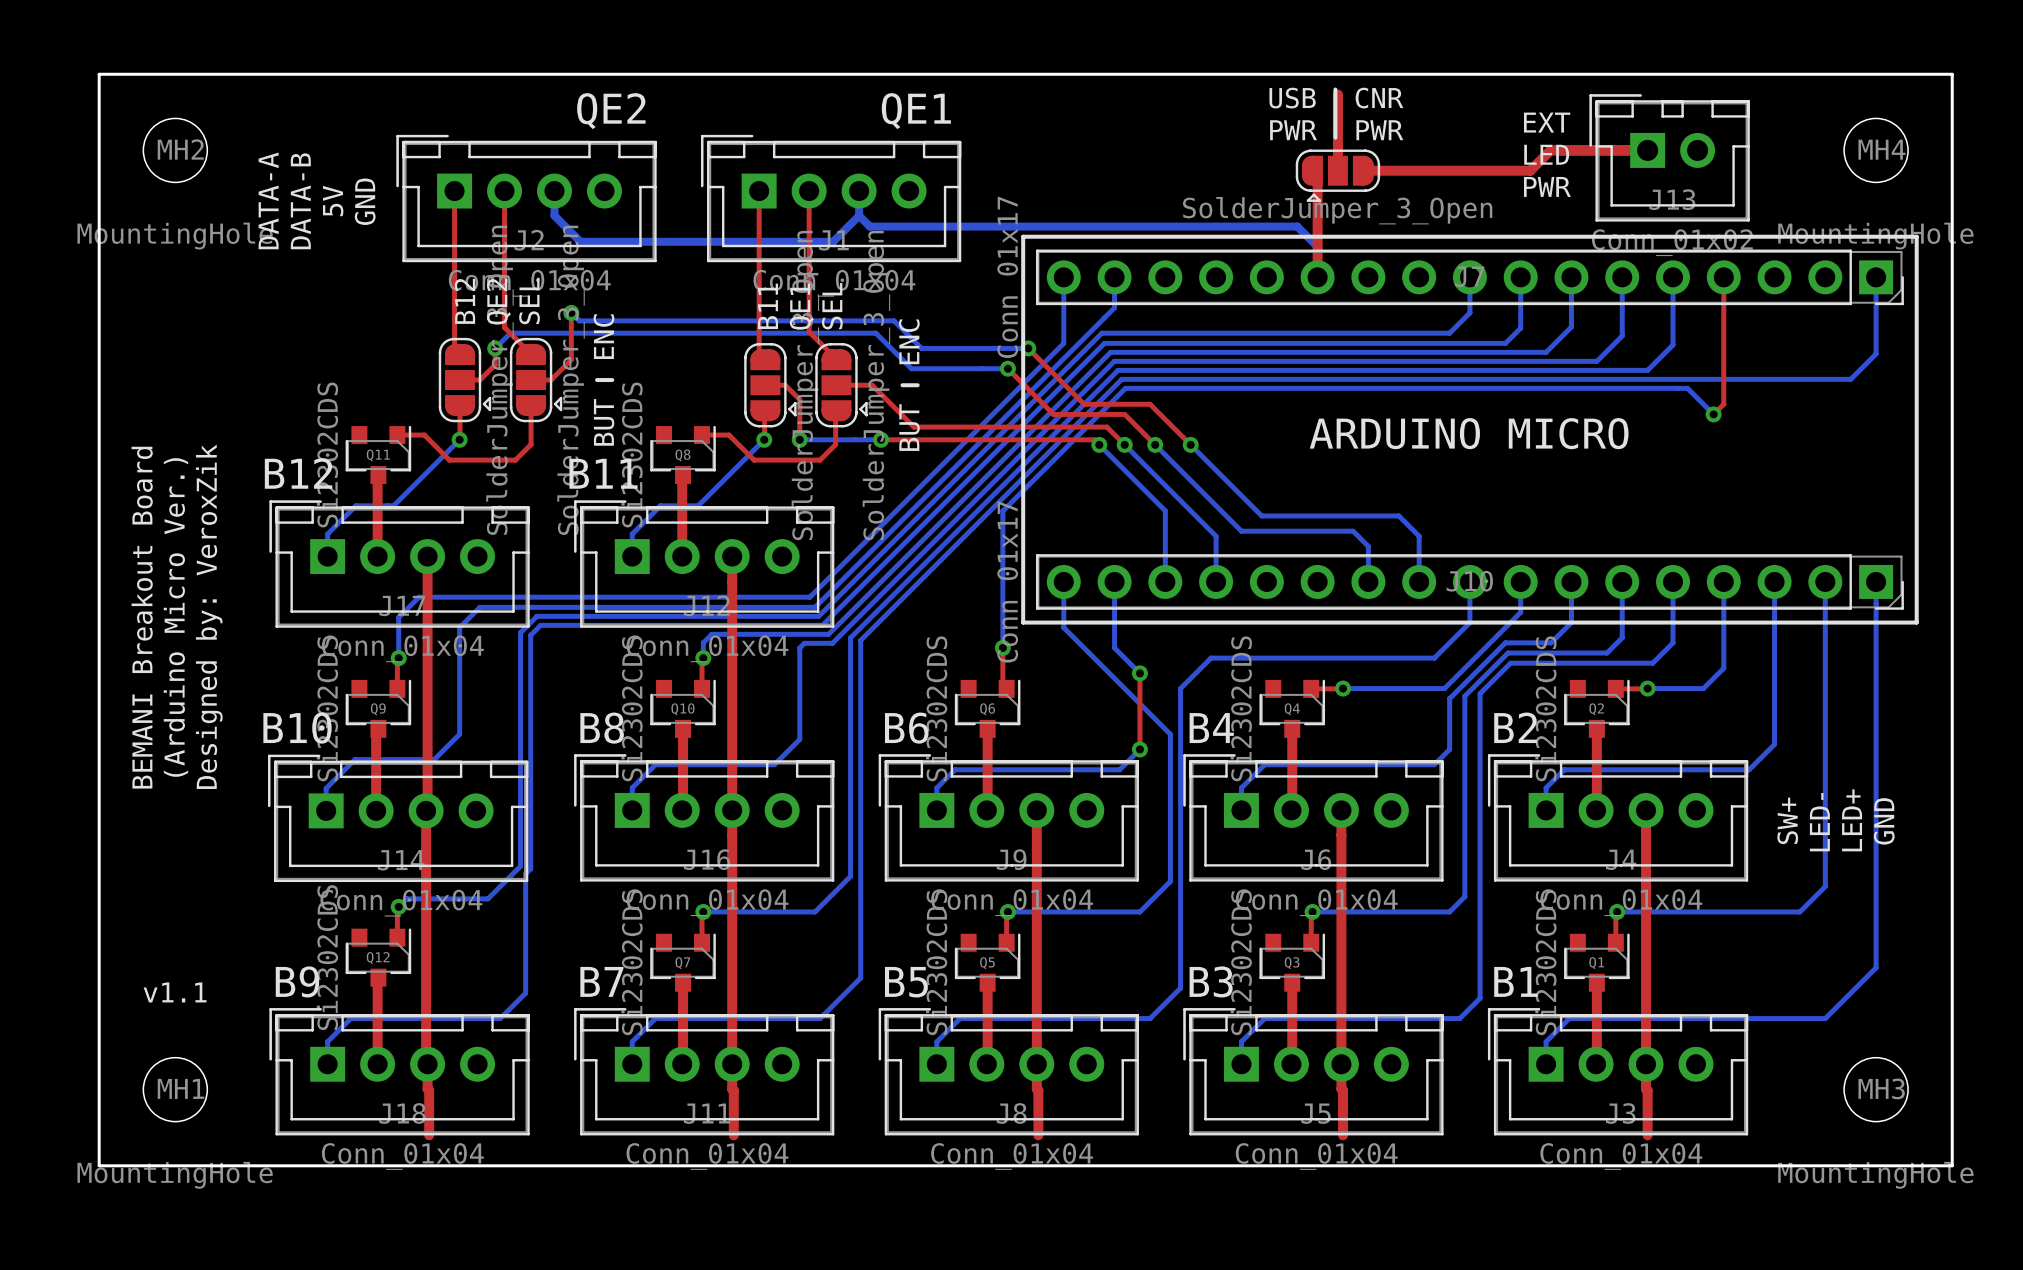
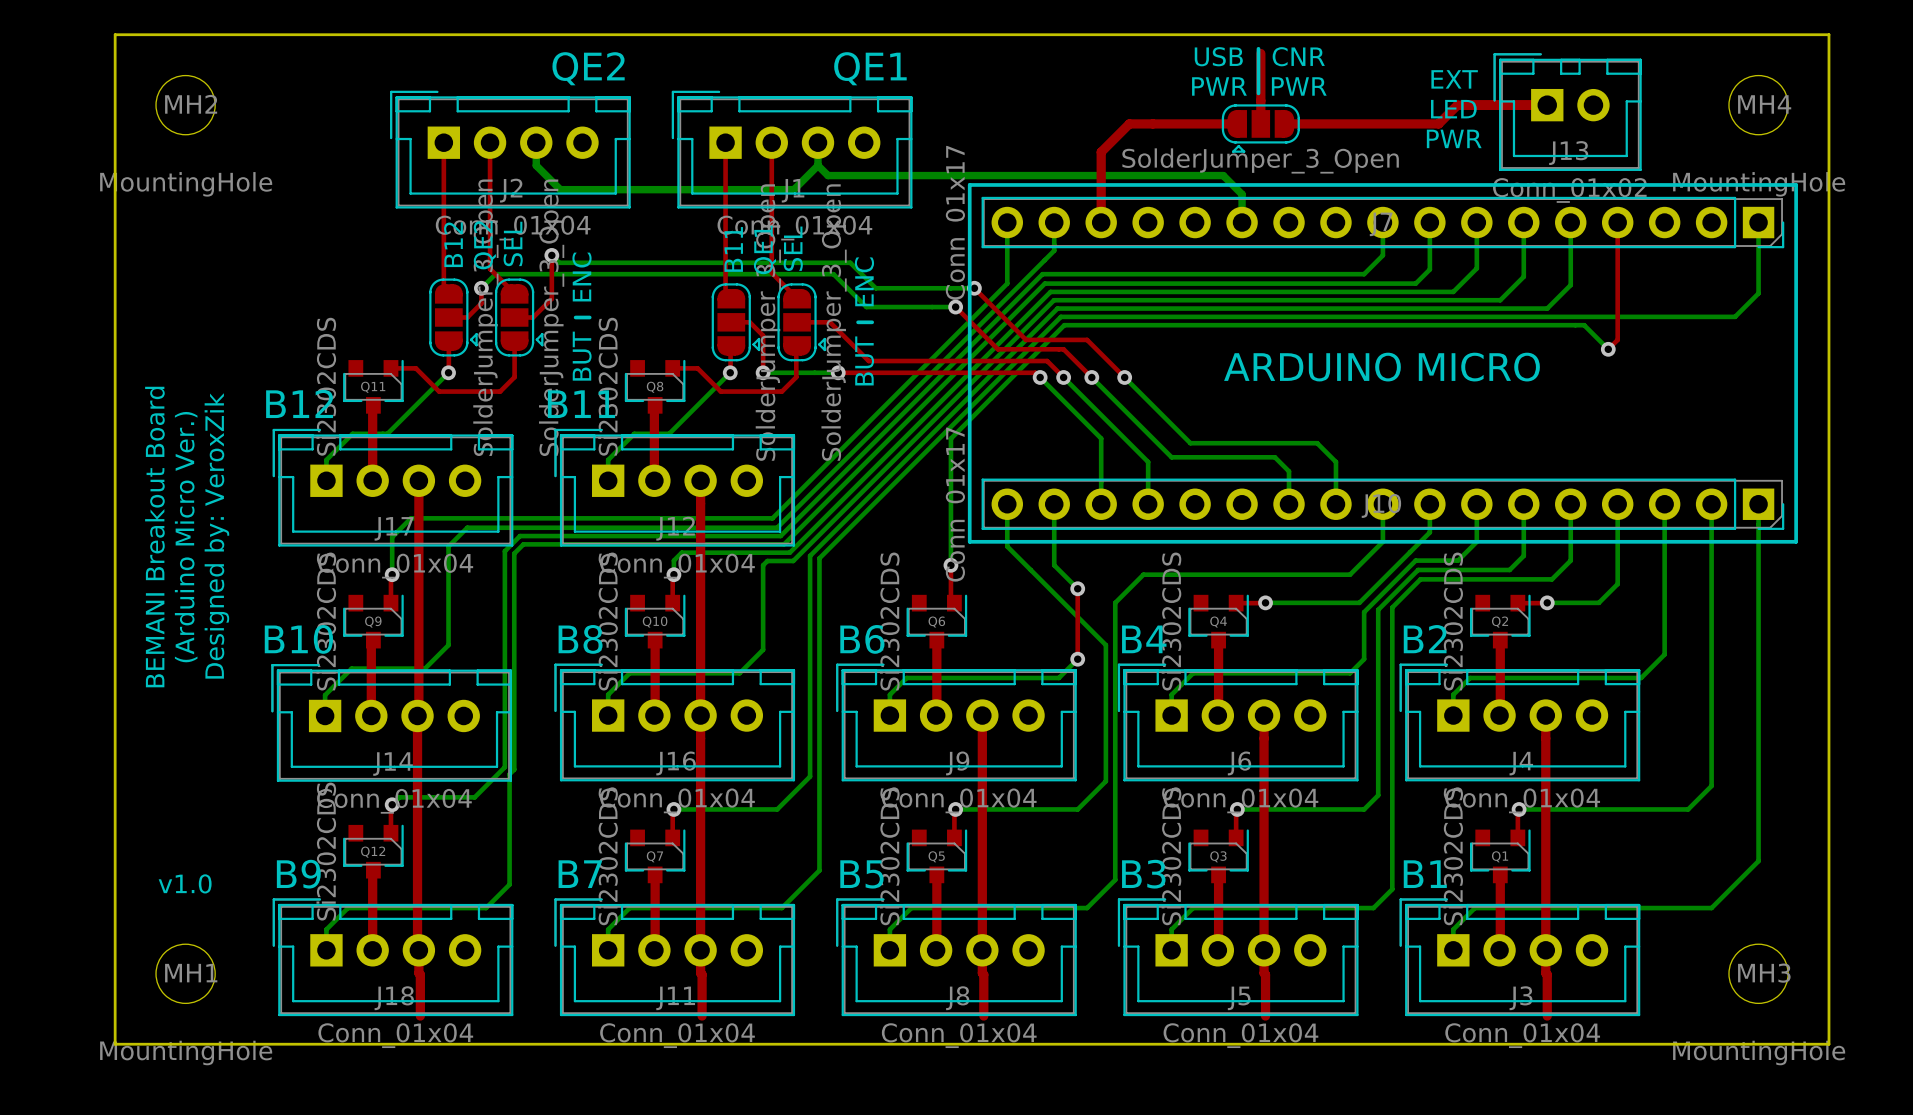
top track: (1311, 170) (1317, 176) (1317, 277) -> (1237, 123) (1129, 123) (1101, 152) (1101, 222)
text: DATA-A (268, 200) -> none
text: DATA-B (300, 201) -> none
text: 5V (333, 201) -> none
text: GND (365, 201) -> none
text: SW+ (1787, 820) -> none
text: LED+ (1852, 820) -> none
text: GND (1884, 821) -> none
text: LED- (1819, 822) -> none
text: v1.1 (175, 992) -> v1.0 (185, 883)

